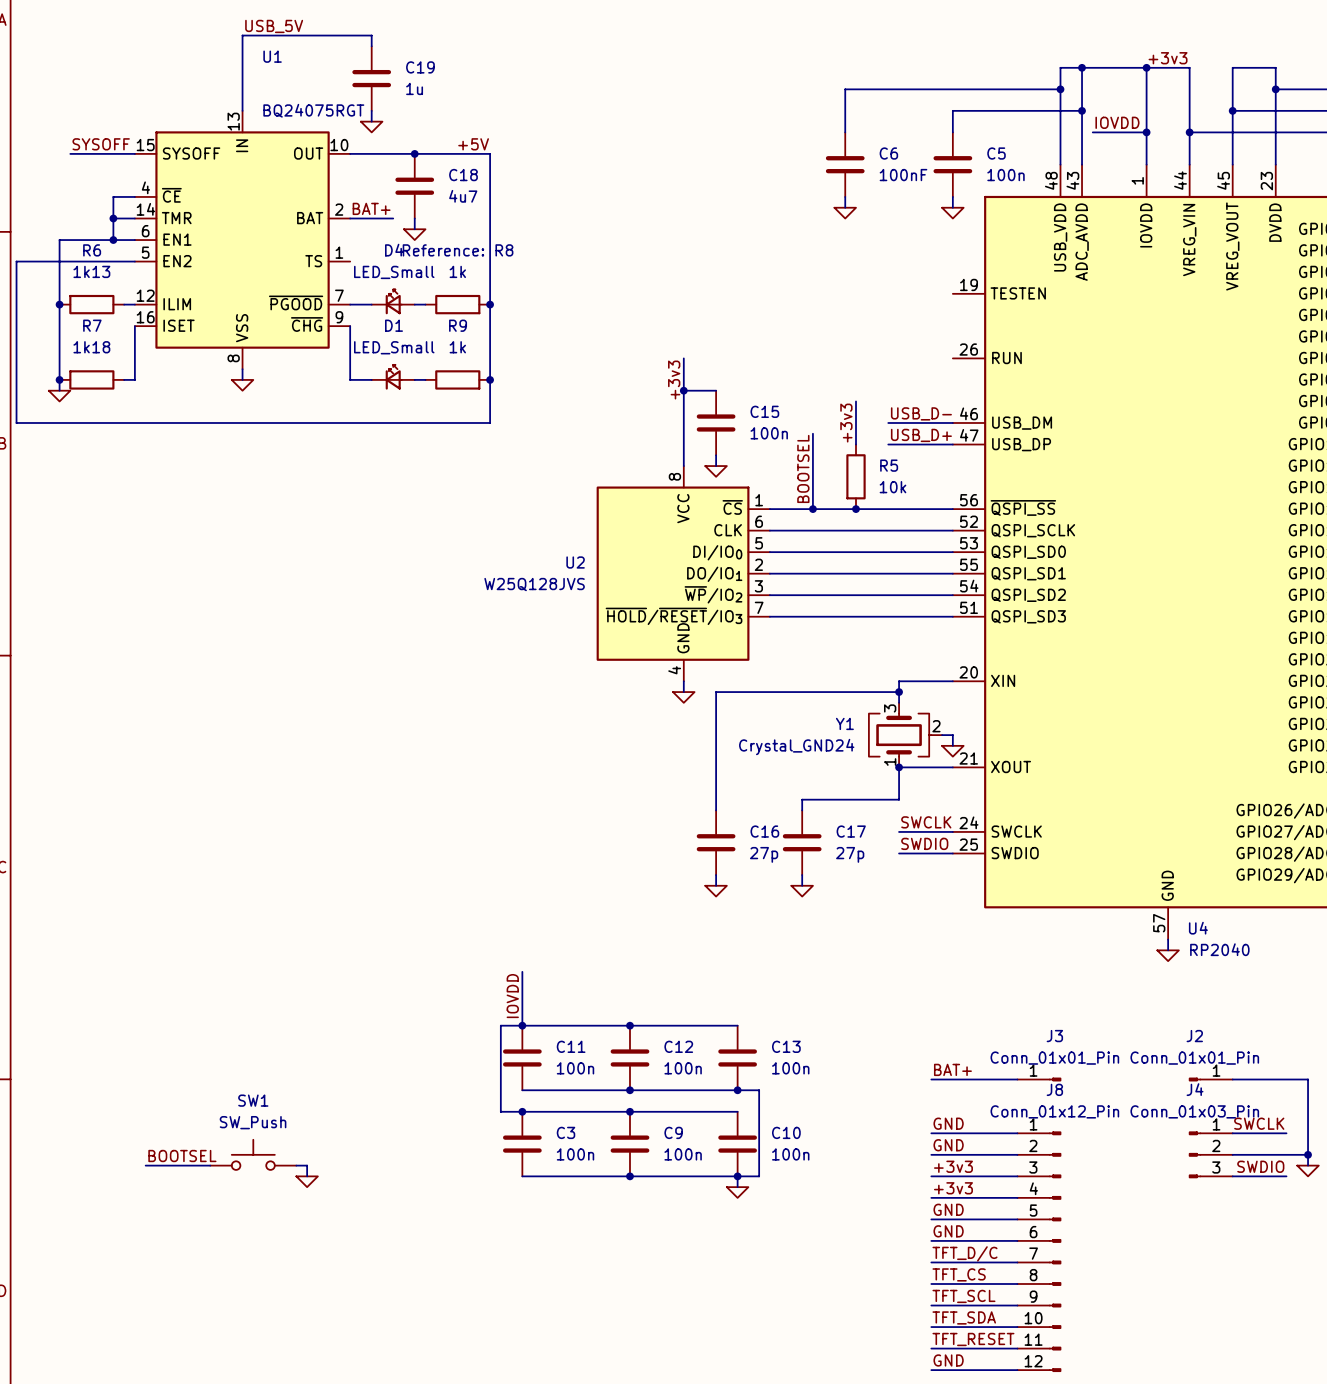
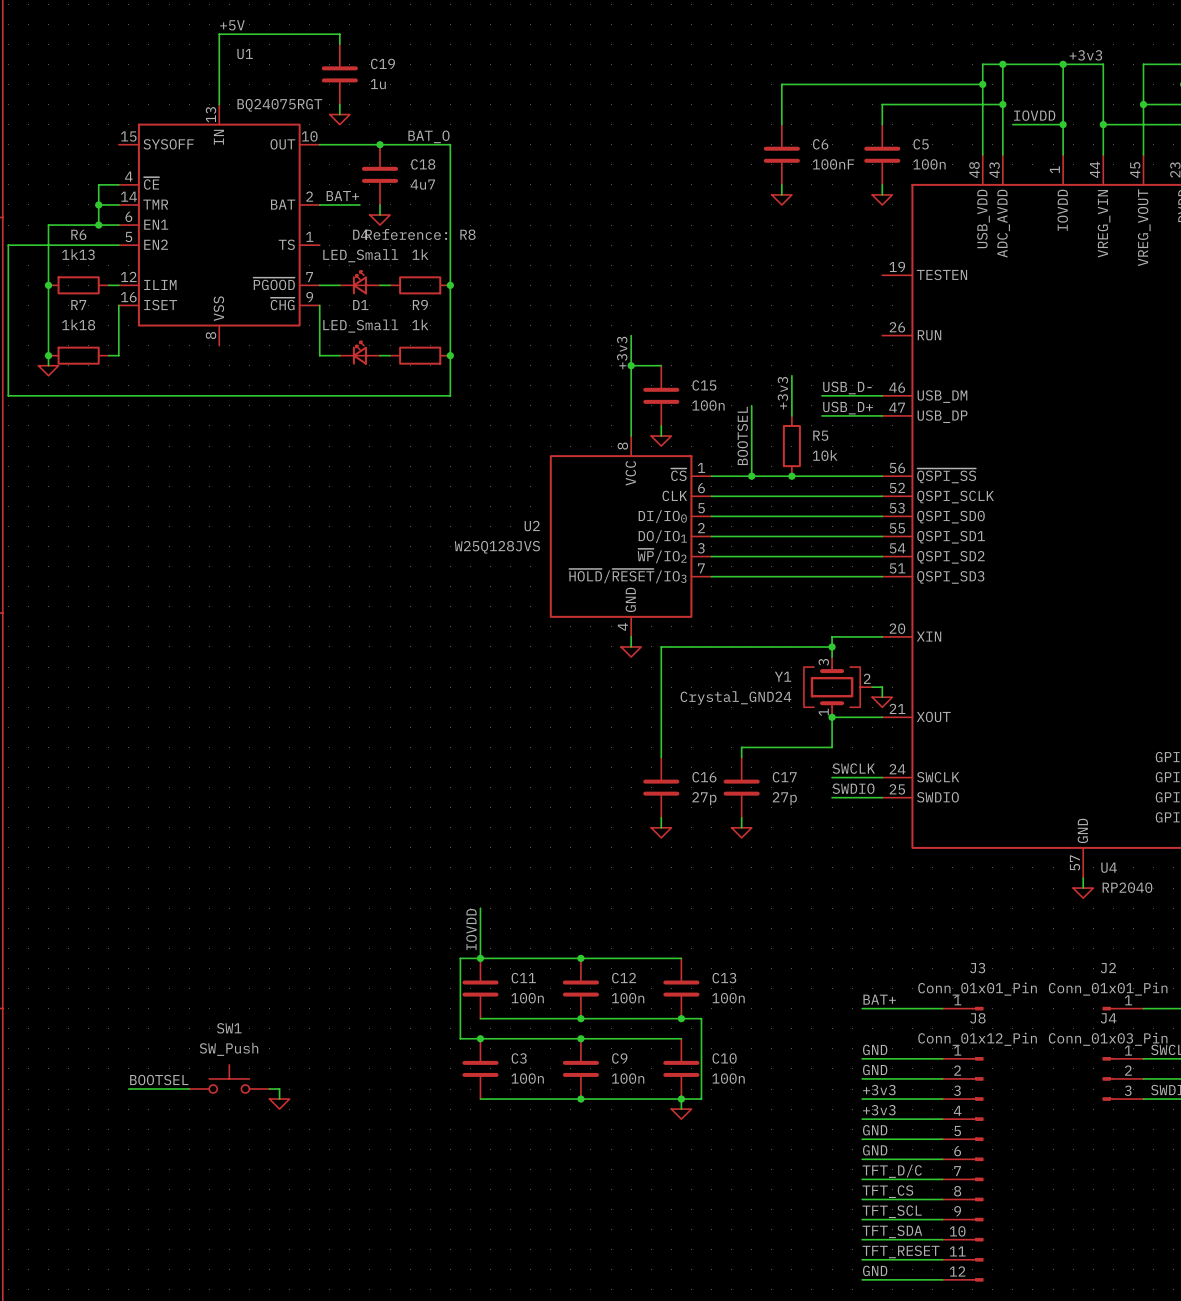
label: USB_5V (274, 26) -> +5V (232, 25)
label: SYSOFF (101, 144) -> none
label: +5V (473, 144) -> BAT_O (428, 136)
wire: (70, 153) (134, 153) -> none
wire: (242, 369) (242, 379) -> none
power symbol: (242, 385) -> none

